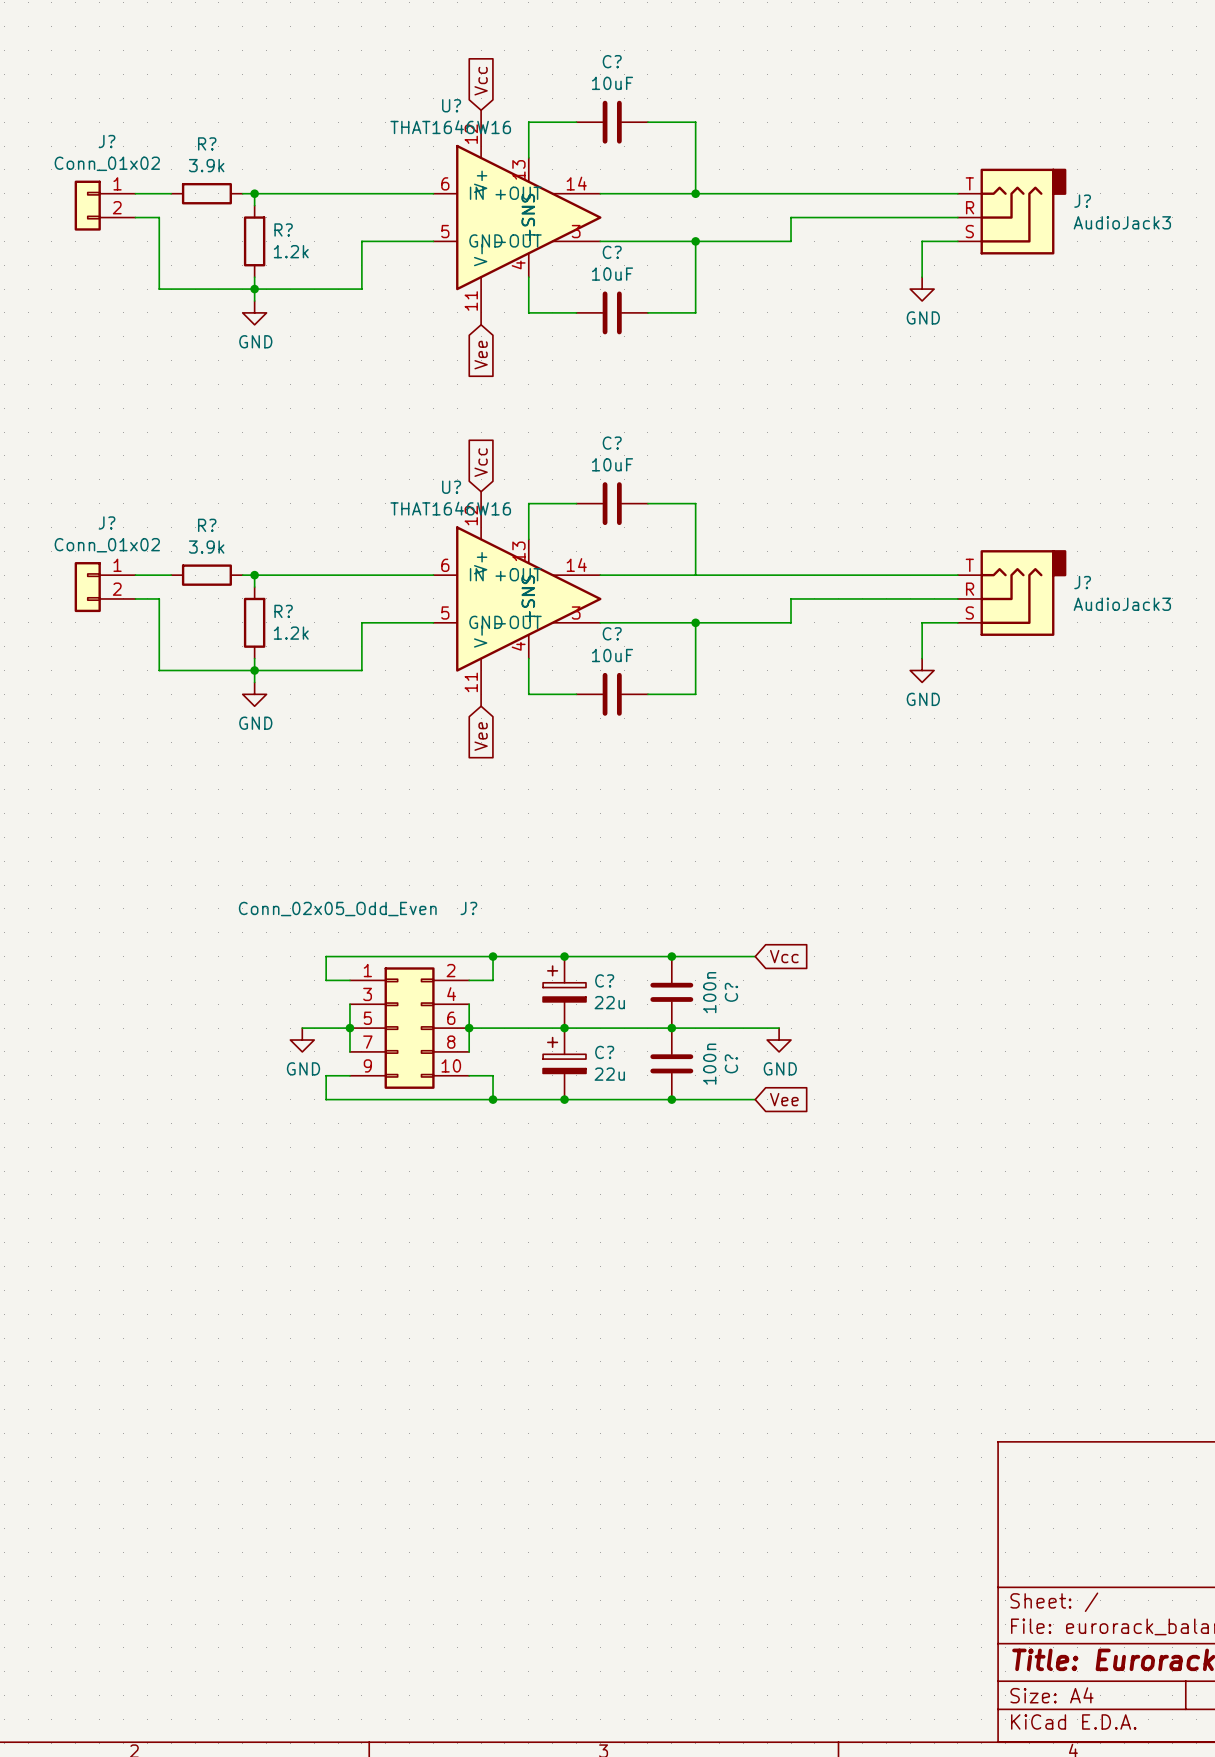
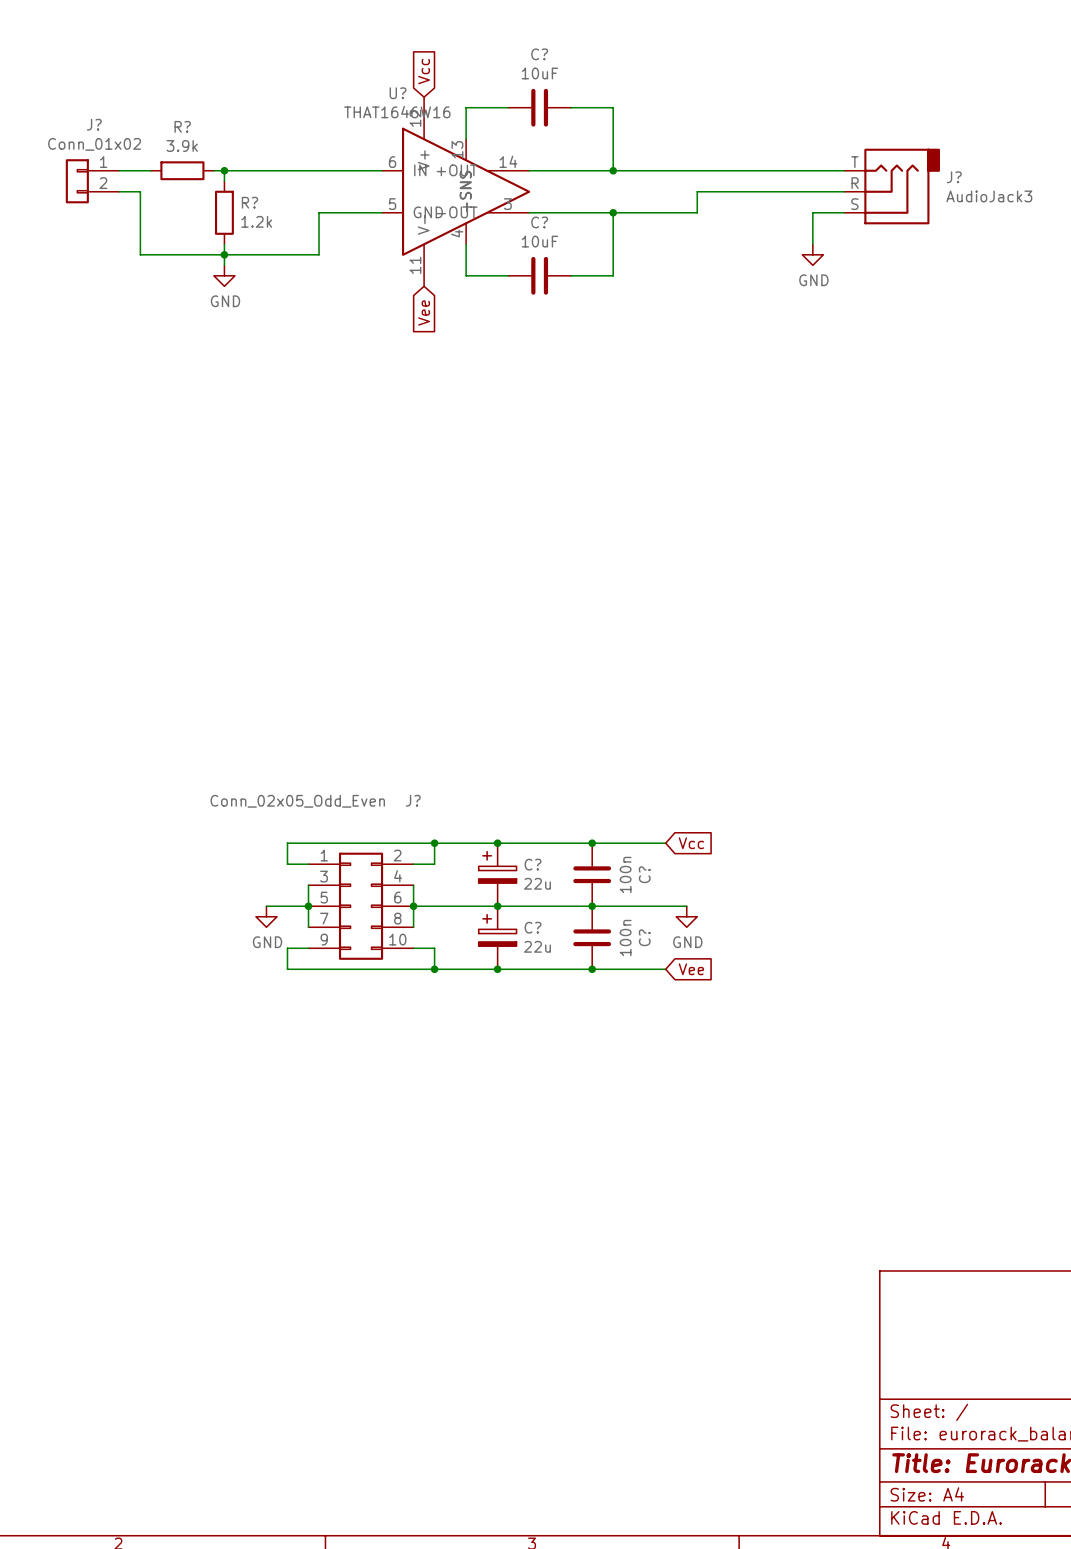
global label: Vcc (481, 462) -> none
wire: (576, 503) (528, 503) (528, 539) -> none
C?: 10uF (612, 503) -> none
wire: (647, 503) (695, 503) (695, 575) -> none
wire: (135, 575) (171, 575) -> none
R?: 3.9k (206, 575) -> none
wire: (242, 575) (433, 575) -> none
wire: (254, 575) (254, 587) -> none
junction: (254, 575) -> none
wire: (600, 575) (957, 575) -> none
J?: Conn_01x02 (105, 587) -> none
J?: AudioJack3 (1012, 593) -> none
wire: (135, 598) (159, 598) (159, 670) (361, 670) (361, 622) (433, 622) -> none
U?: THAT1646W16 (517, 598) -> none
wire: (957, 598) (791, 598) (791, 622) (600, 622) -> none
R?: 1.2k (254, 622) -> none
wire: (695, 622) (695, 694) (647, 694) -> none
junction: (695, 622) -> none
wire: (957, 622) (922, 622) (922, 658) -> none
wire: (254, 658) (254, 682) -> none
wire: (528, 658) (528, 694) (576, 694) -> none
junction: (254, 670) -> none
power symbol: GND (922, 670) -> none
power symbol: GND (254, 694) -> none
C?: 10uF (612, 694) -> none
global label: Vee (481, 736) -> none

